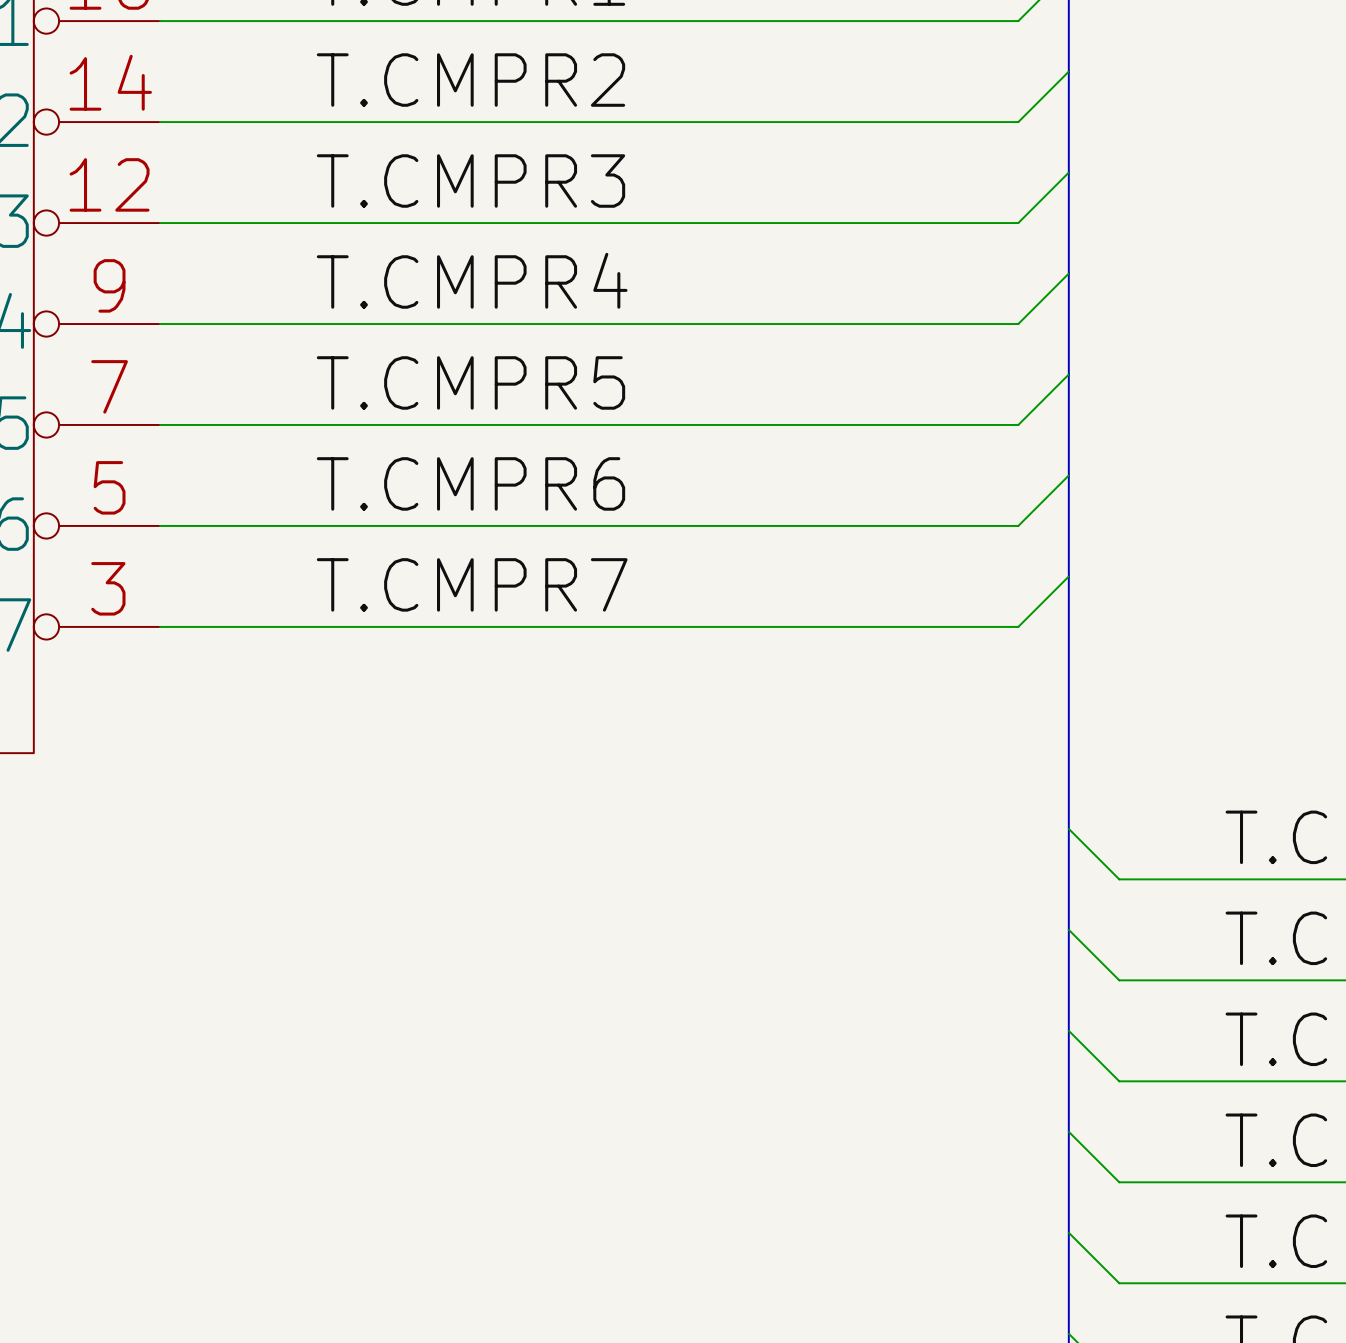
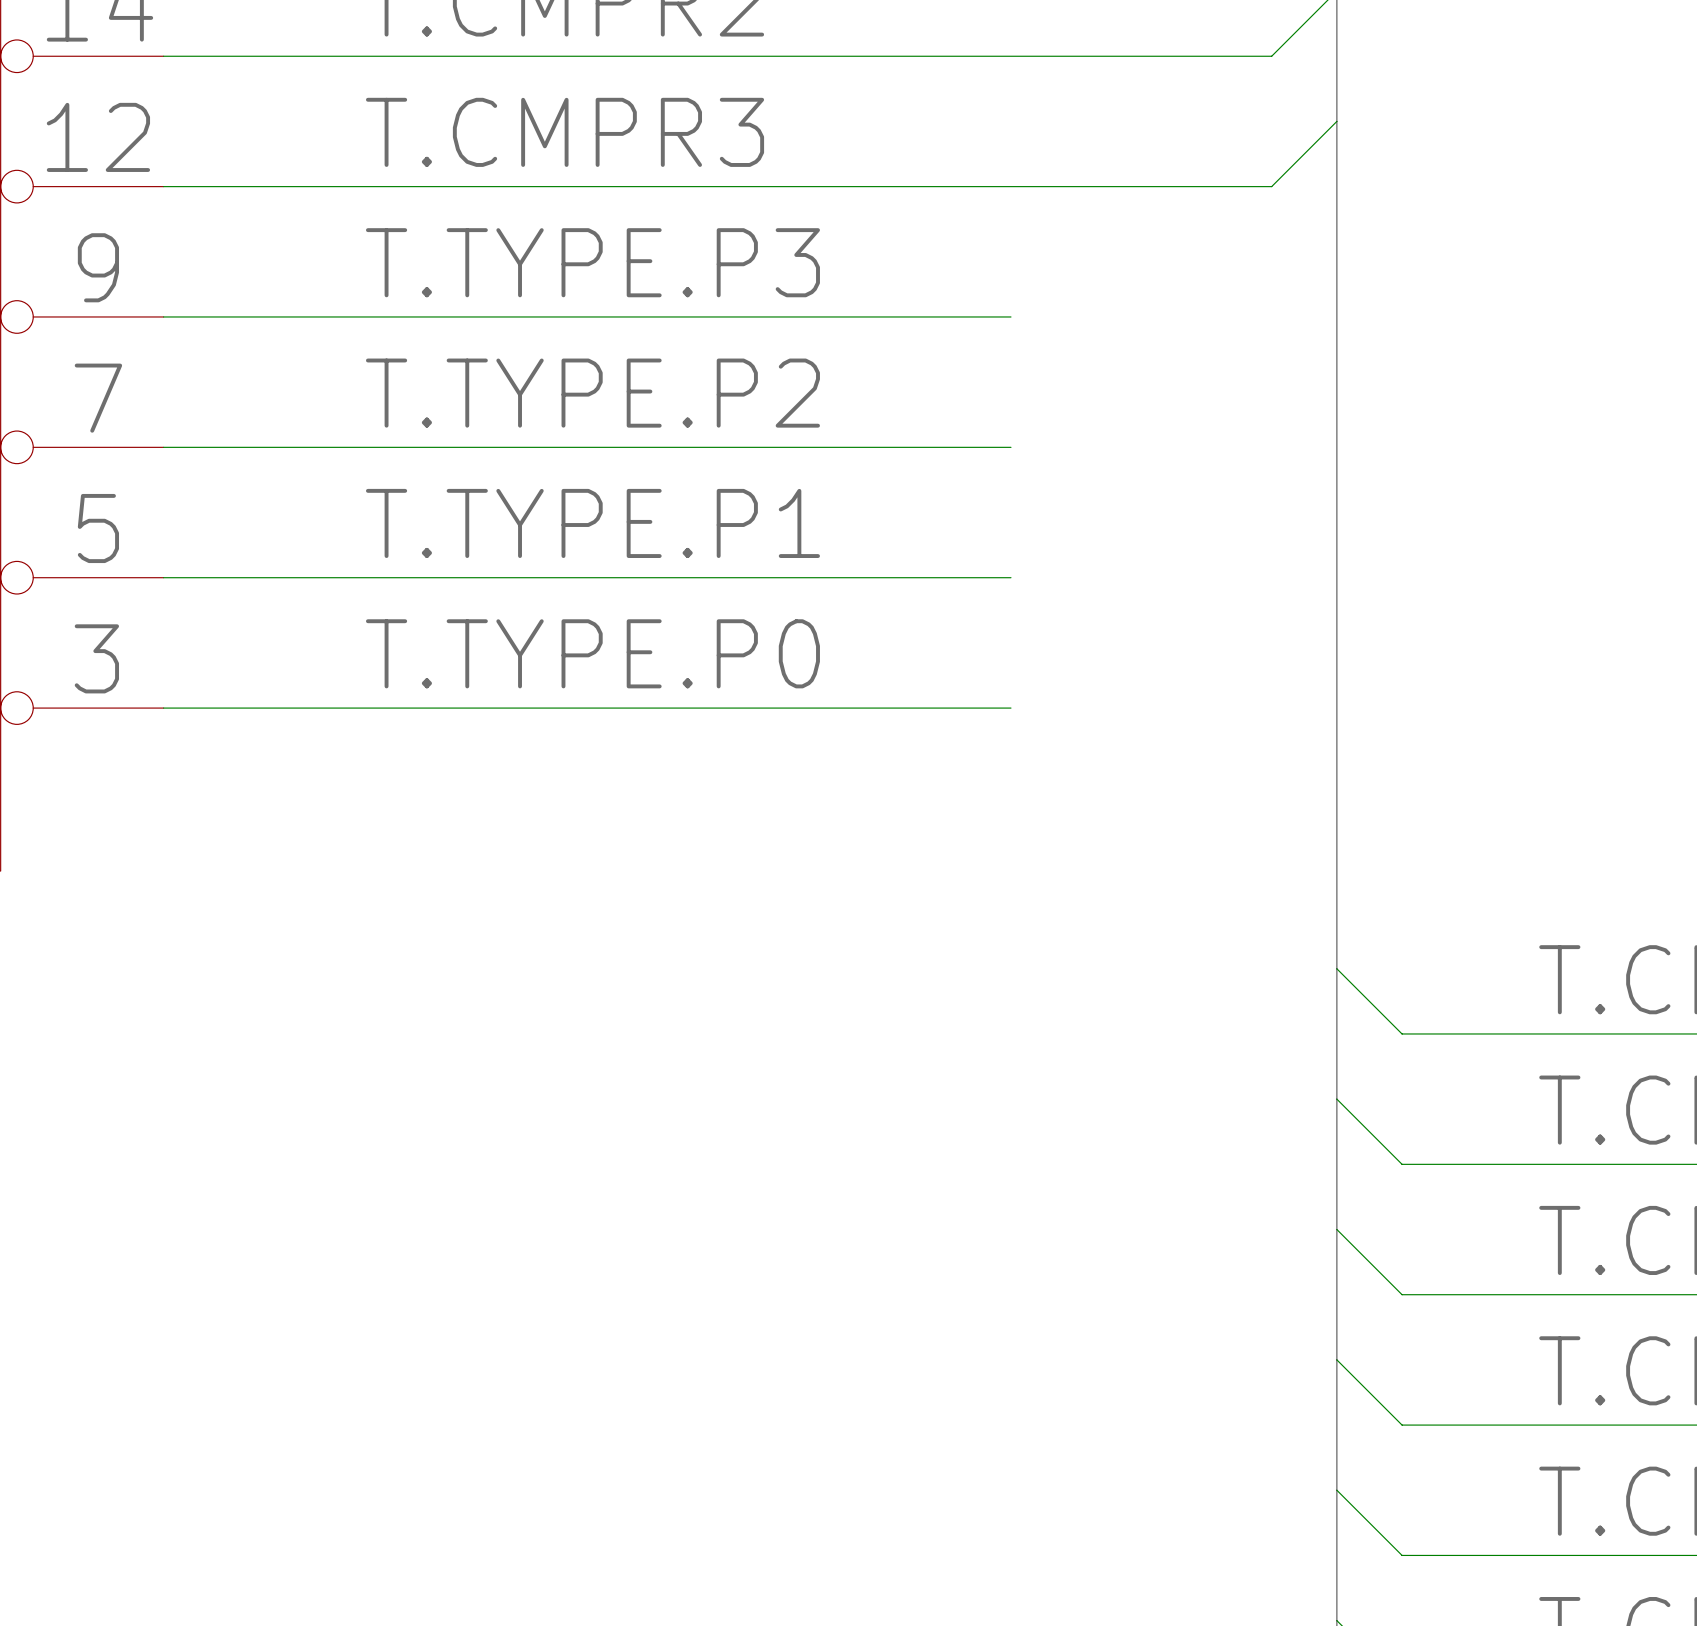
wire: (1068, 273) (1018, 324) (816, 324) -> none
label: T.CMPR4 (472, 280) -> T.TYPE.P3 (592, 262)
wire: (1068, 374) (1018, 424) (816, 424) -> none
label: T.CMPR5 (470, 382) -> T.TYPE.P2 (592, 393)
wire: (1068, 475) (1018, 525) (816, 525) -> none
label: T.CMPR6 (470, 483) -> T.TYPE.P1 (592, 523)
wire: (1068, 576) (1018, 626) (816, 626) -> none
label: T.CMPR7 (472, 584) -> T.TYPE.P0 (592, 653)

